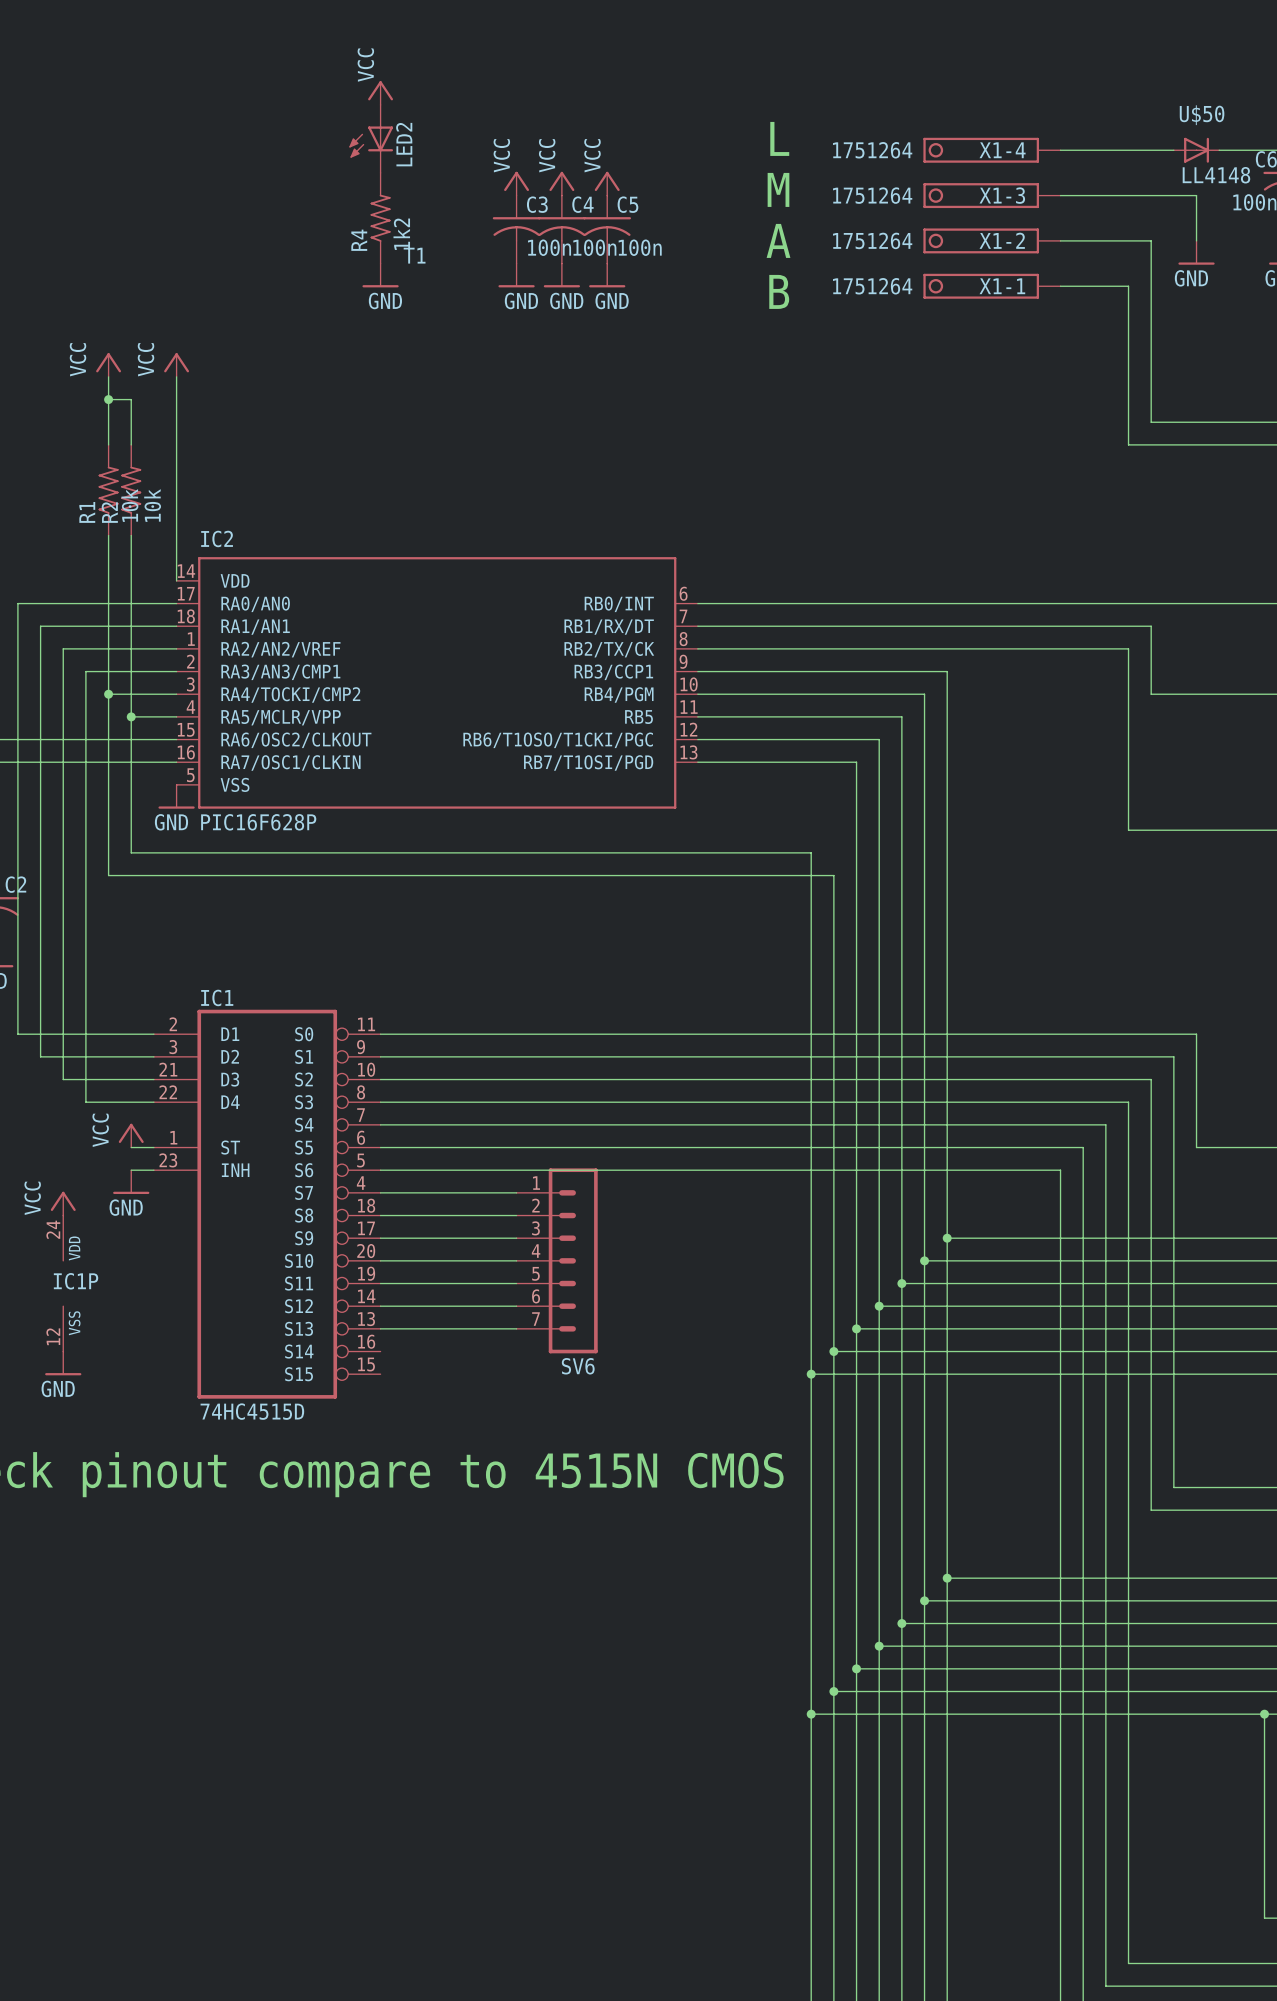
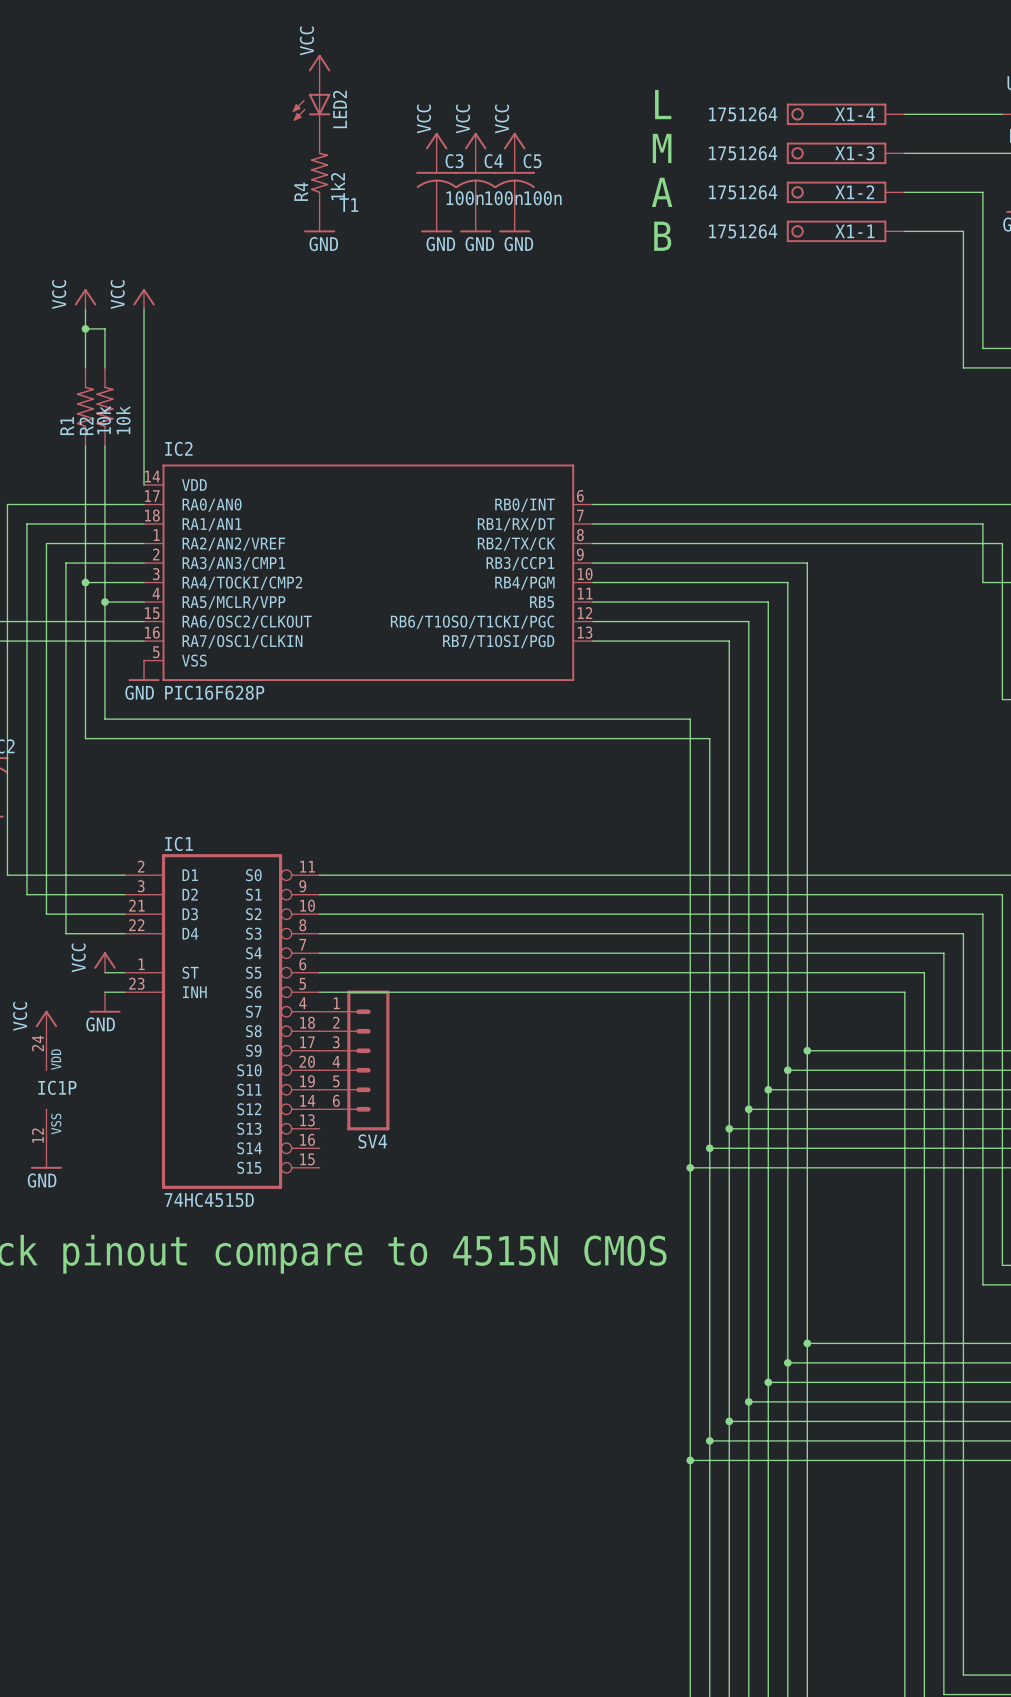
wire: (1128, 648) (1128, 830) (1173, 830) -> (963, 543) (1002, 543) (1002, 699)
wire: (380, 1192) (516, 1192) -> none
wire: (380, 1215) (516, 1215) -> none
wire: (380, 1238) (516, 1238) -> none
SV4: none -> (354, 1060)
wire: (380, 1260) (516, 1260) -> none
SV6: (557, 1260) -> none
wire: (380, 1283) (516, 1283) -> none
wire: (380, 1306) (516, 1306) -> none
wire: (380, 1328) (516, 1328) -> none

